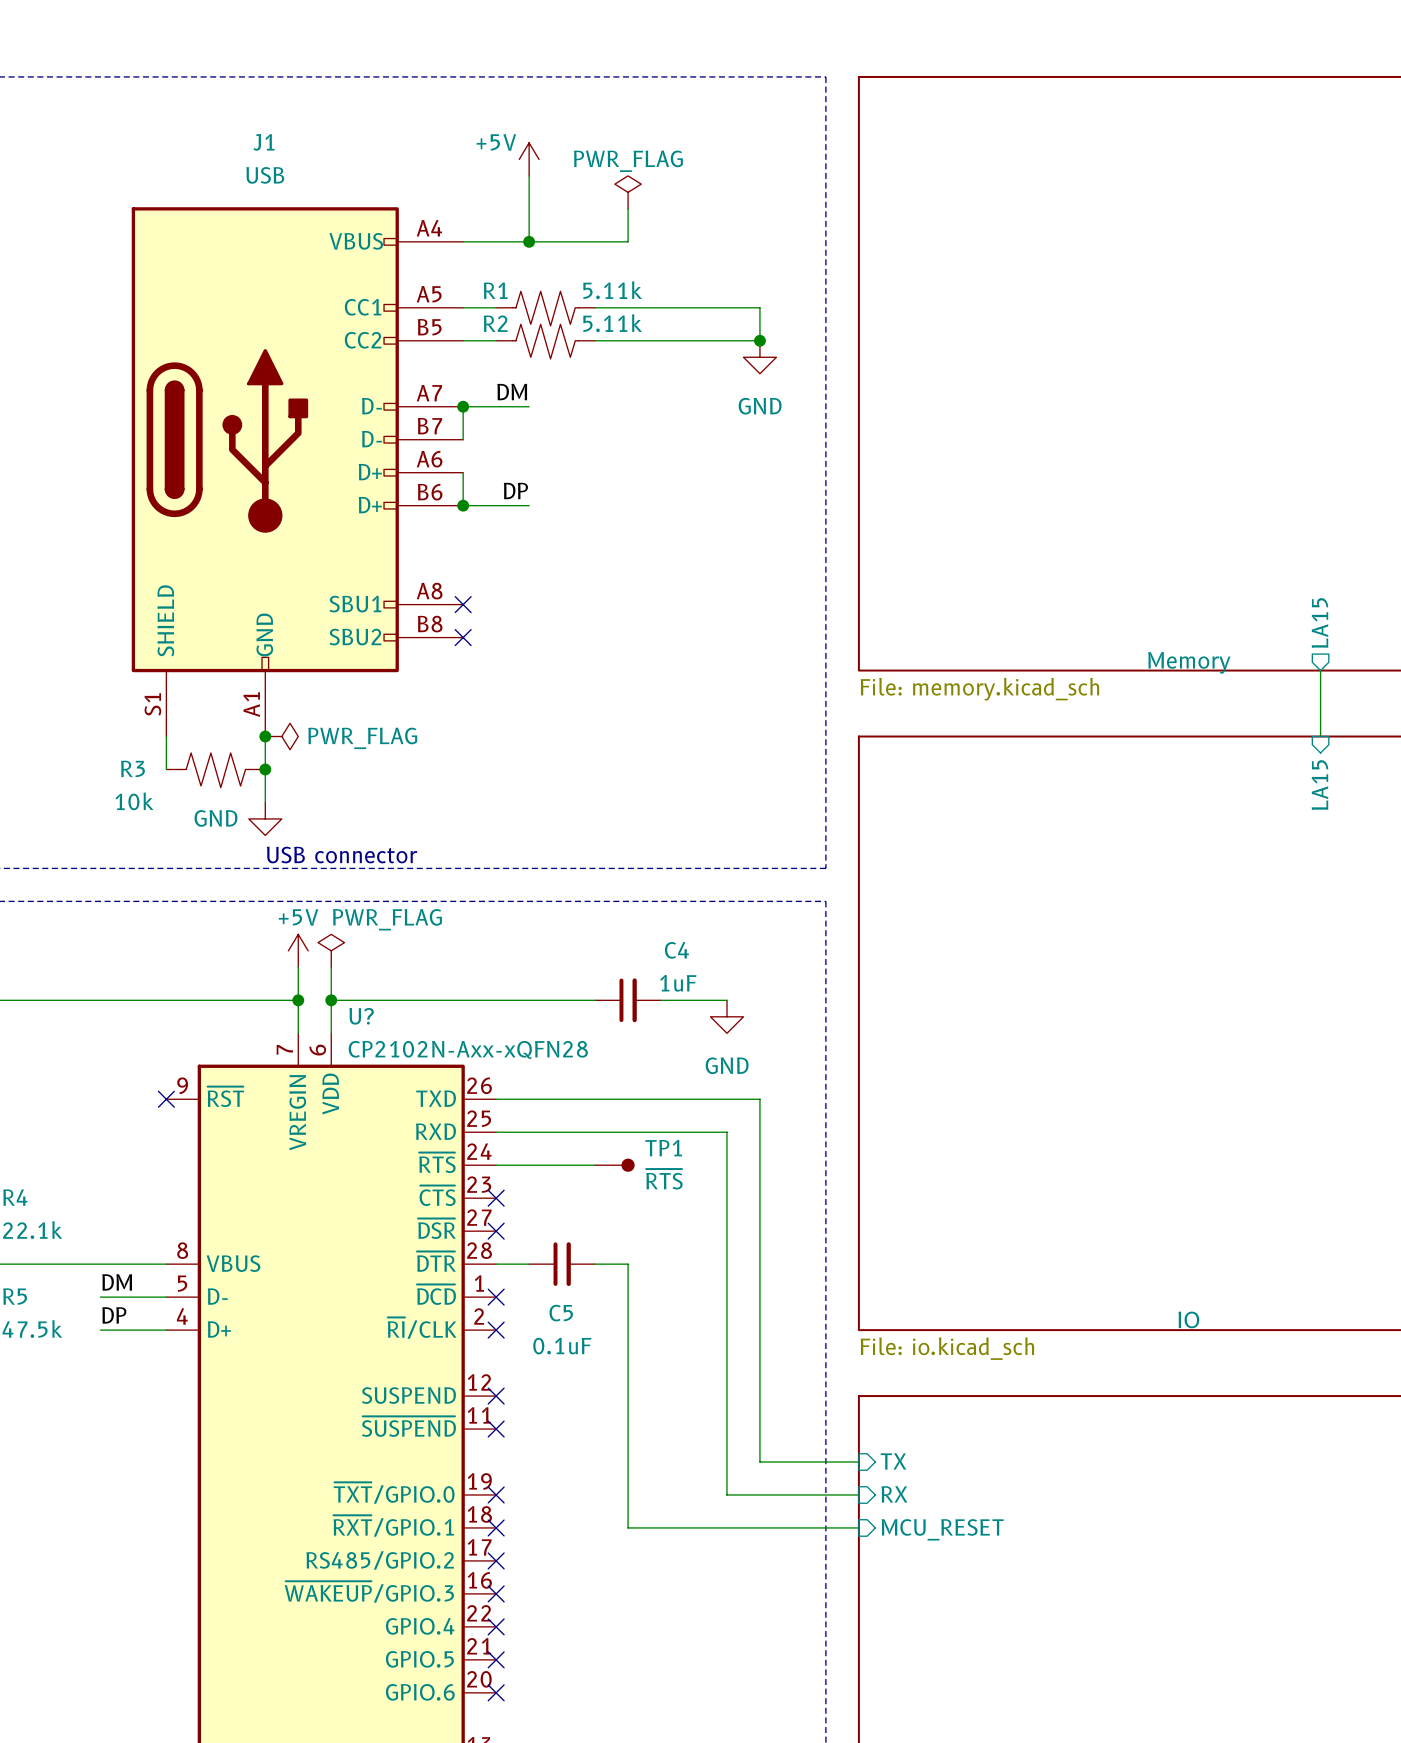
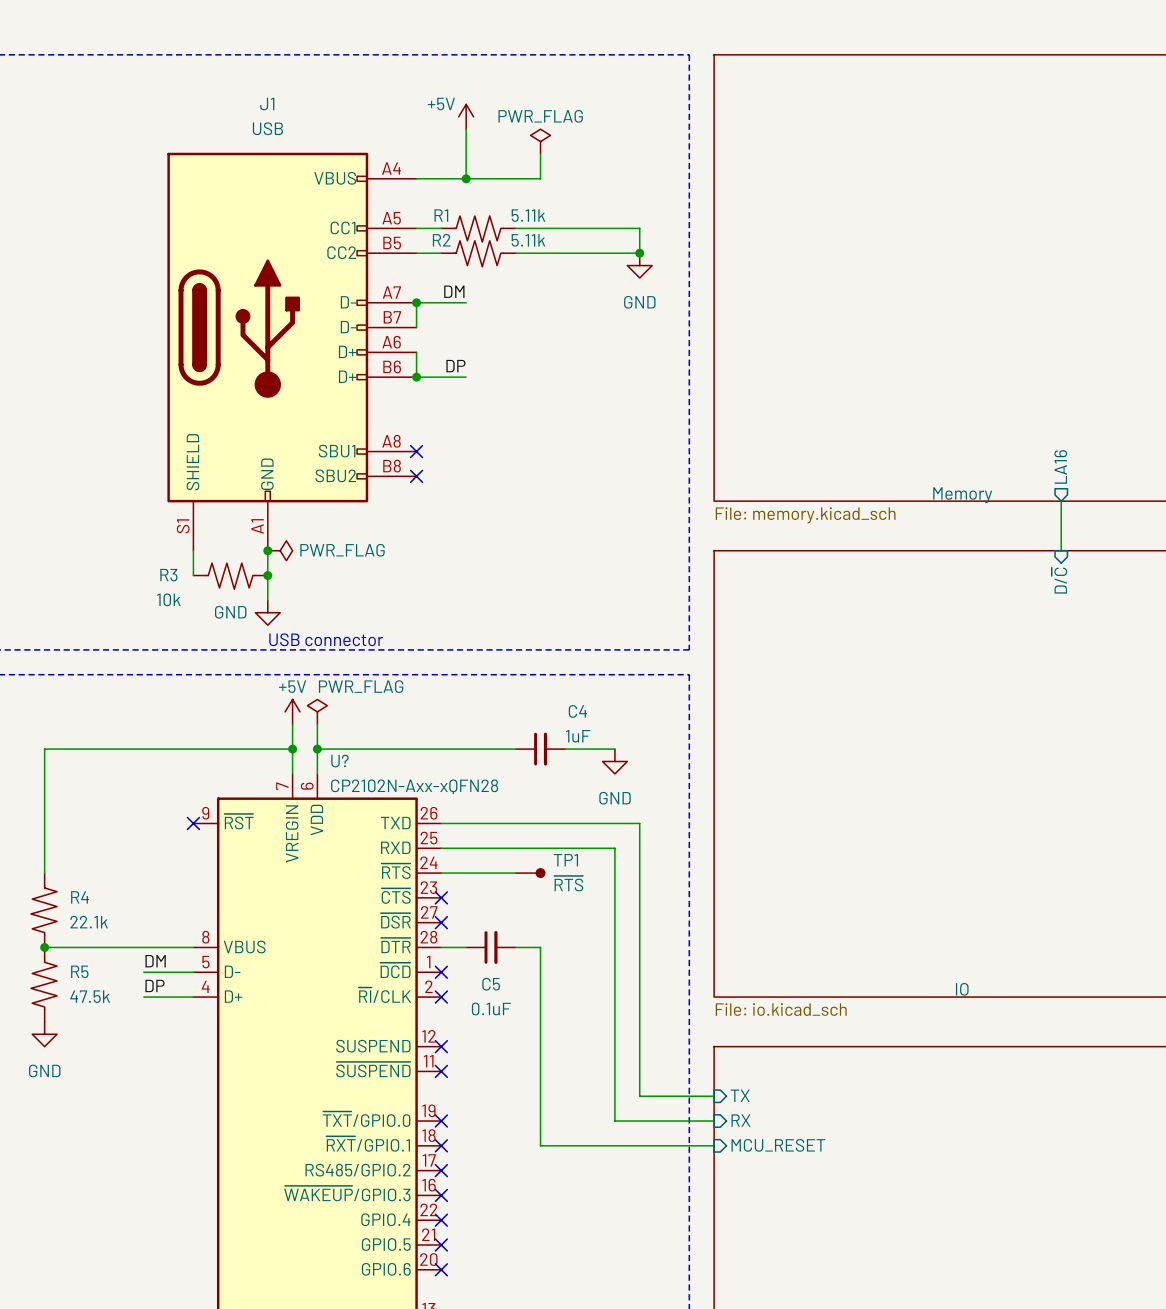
sheet pin: LA15 (1319, 622) -> LA16 (1060, 466)
sheet pin: LA15 (1319, 785) -> D/~{C} (1059, 580)

